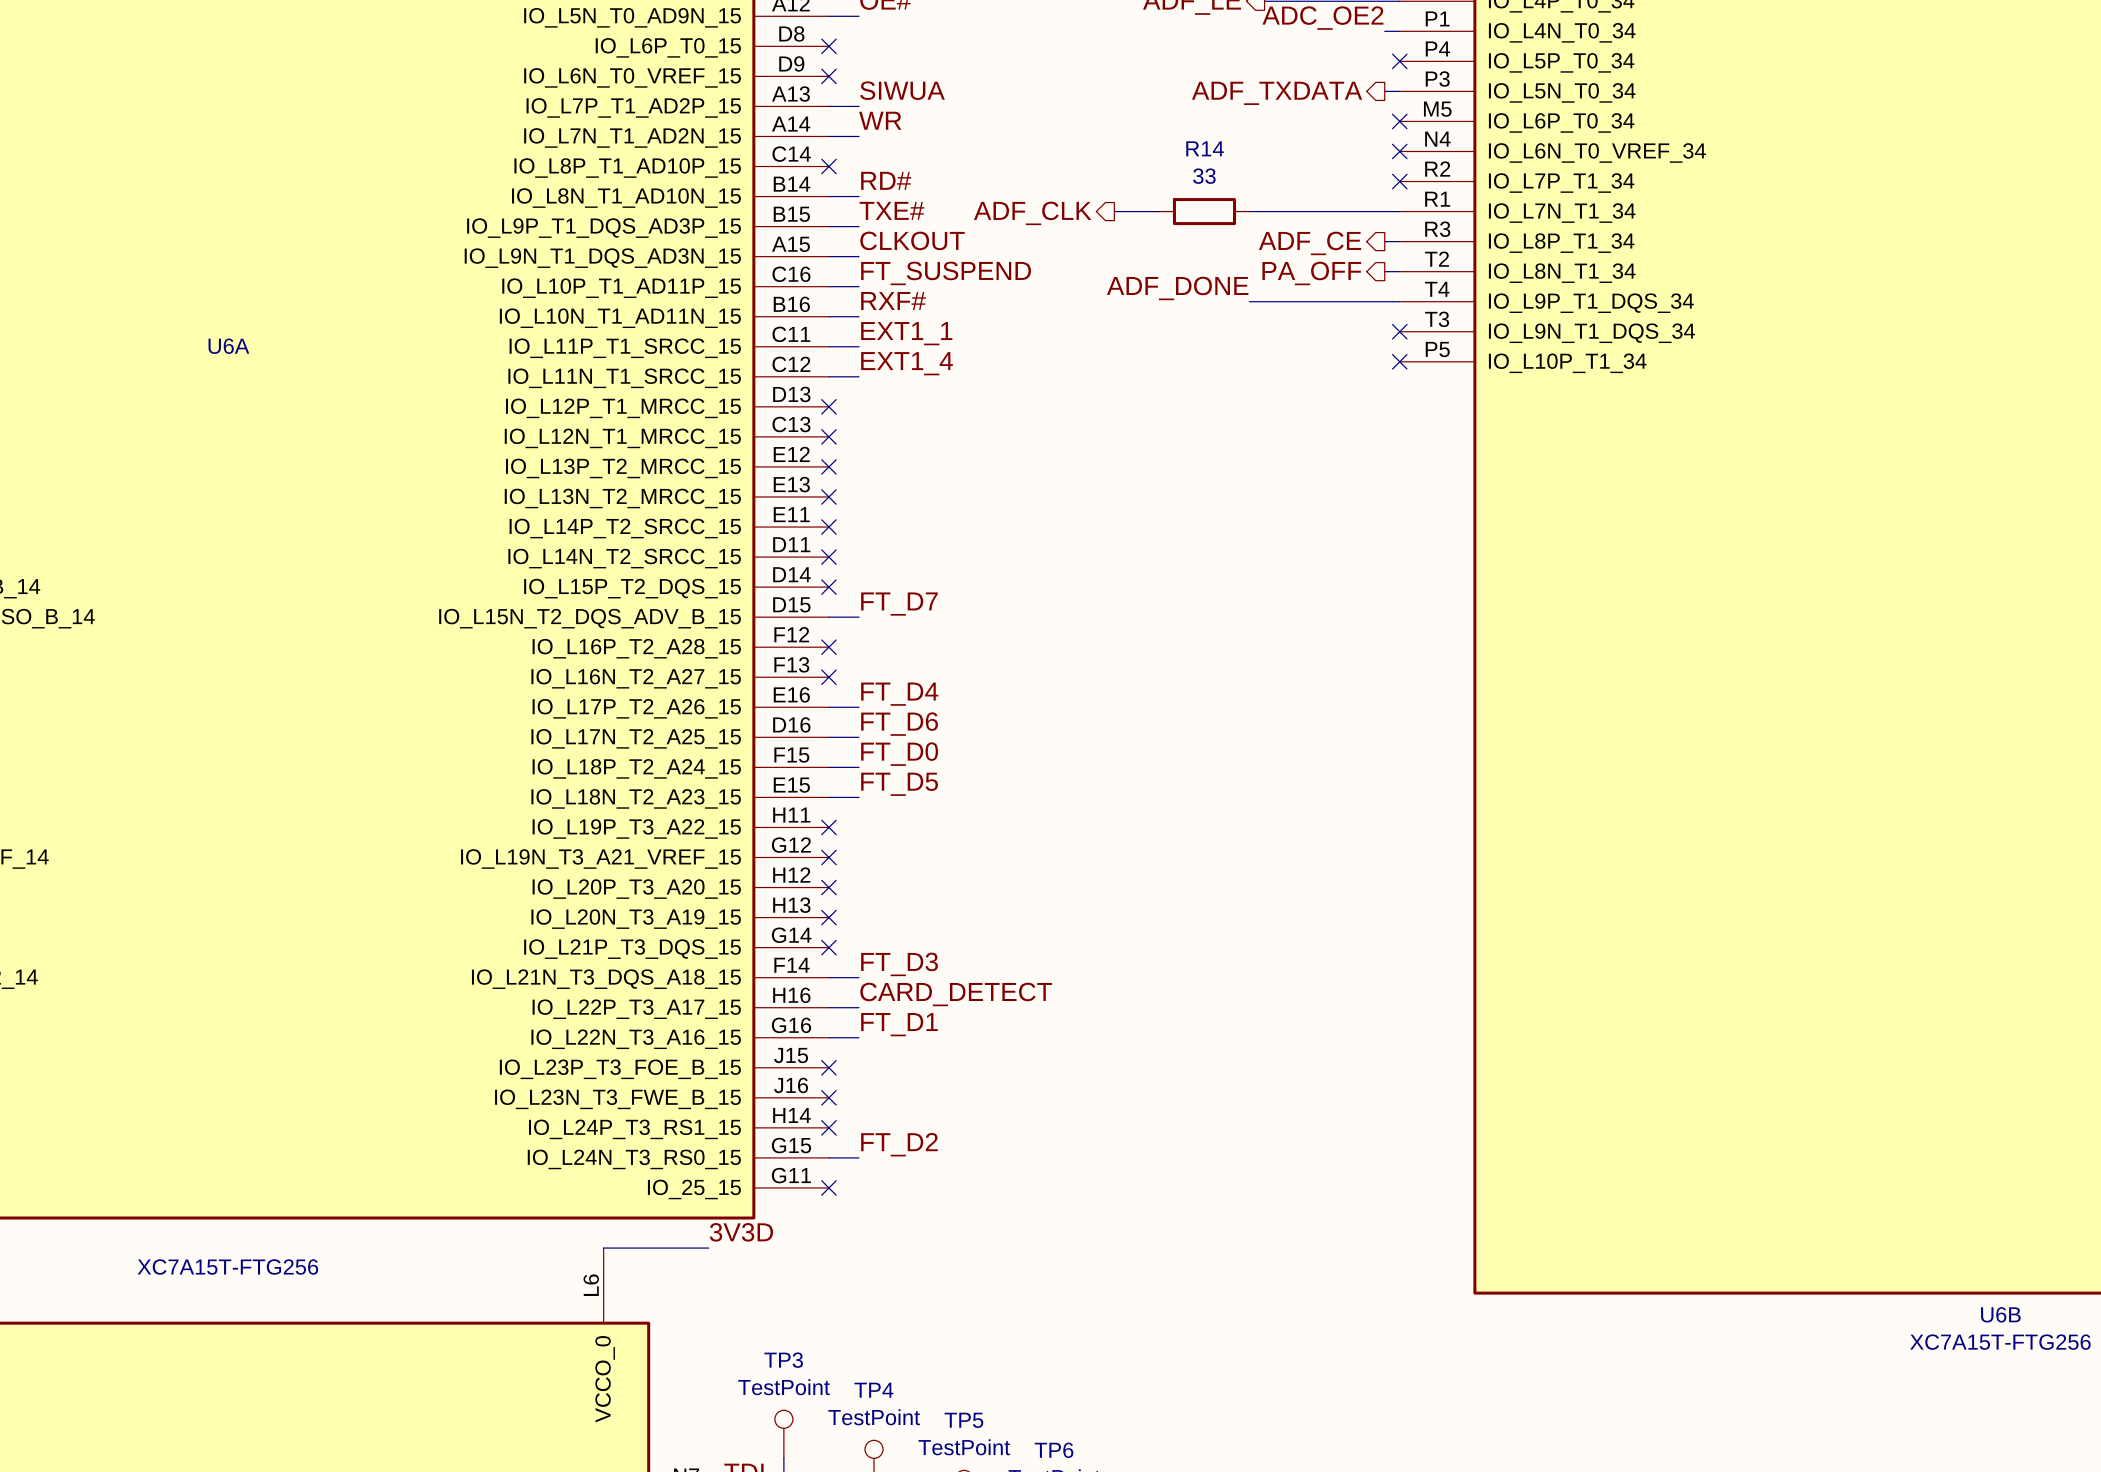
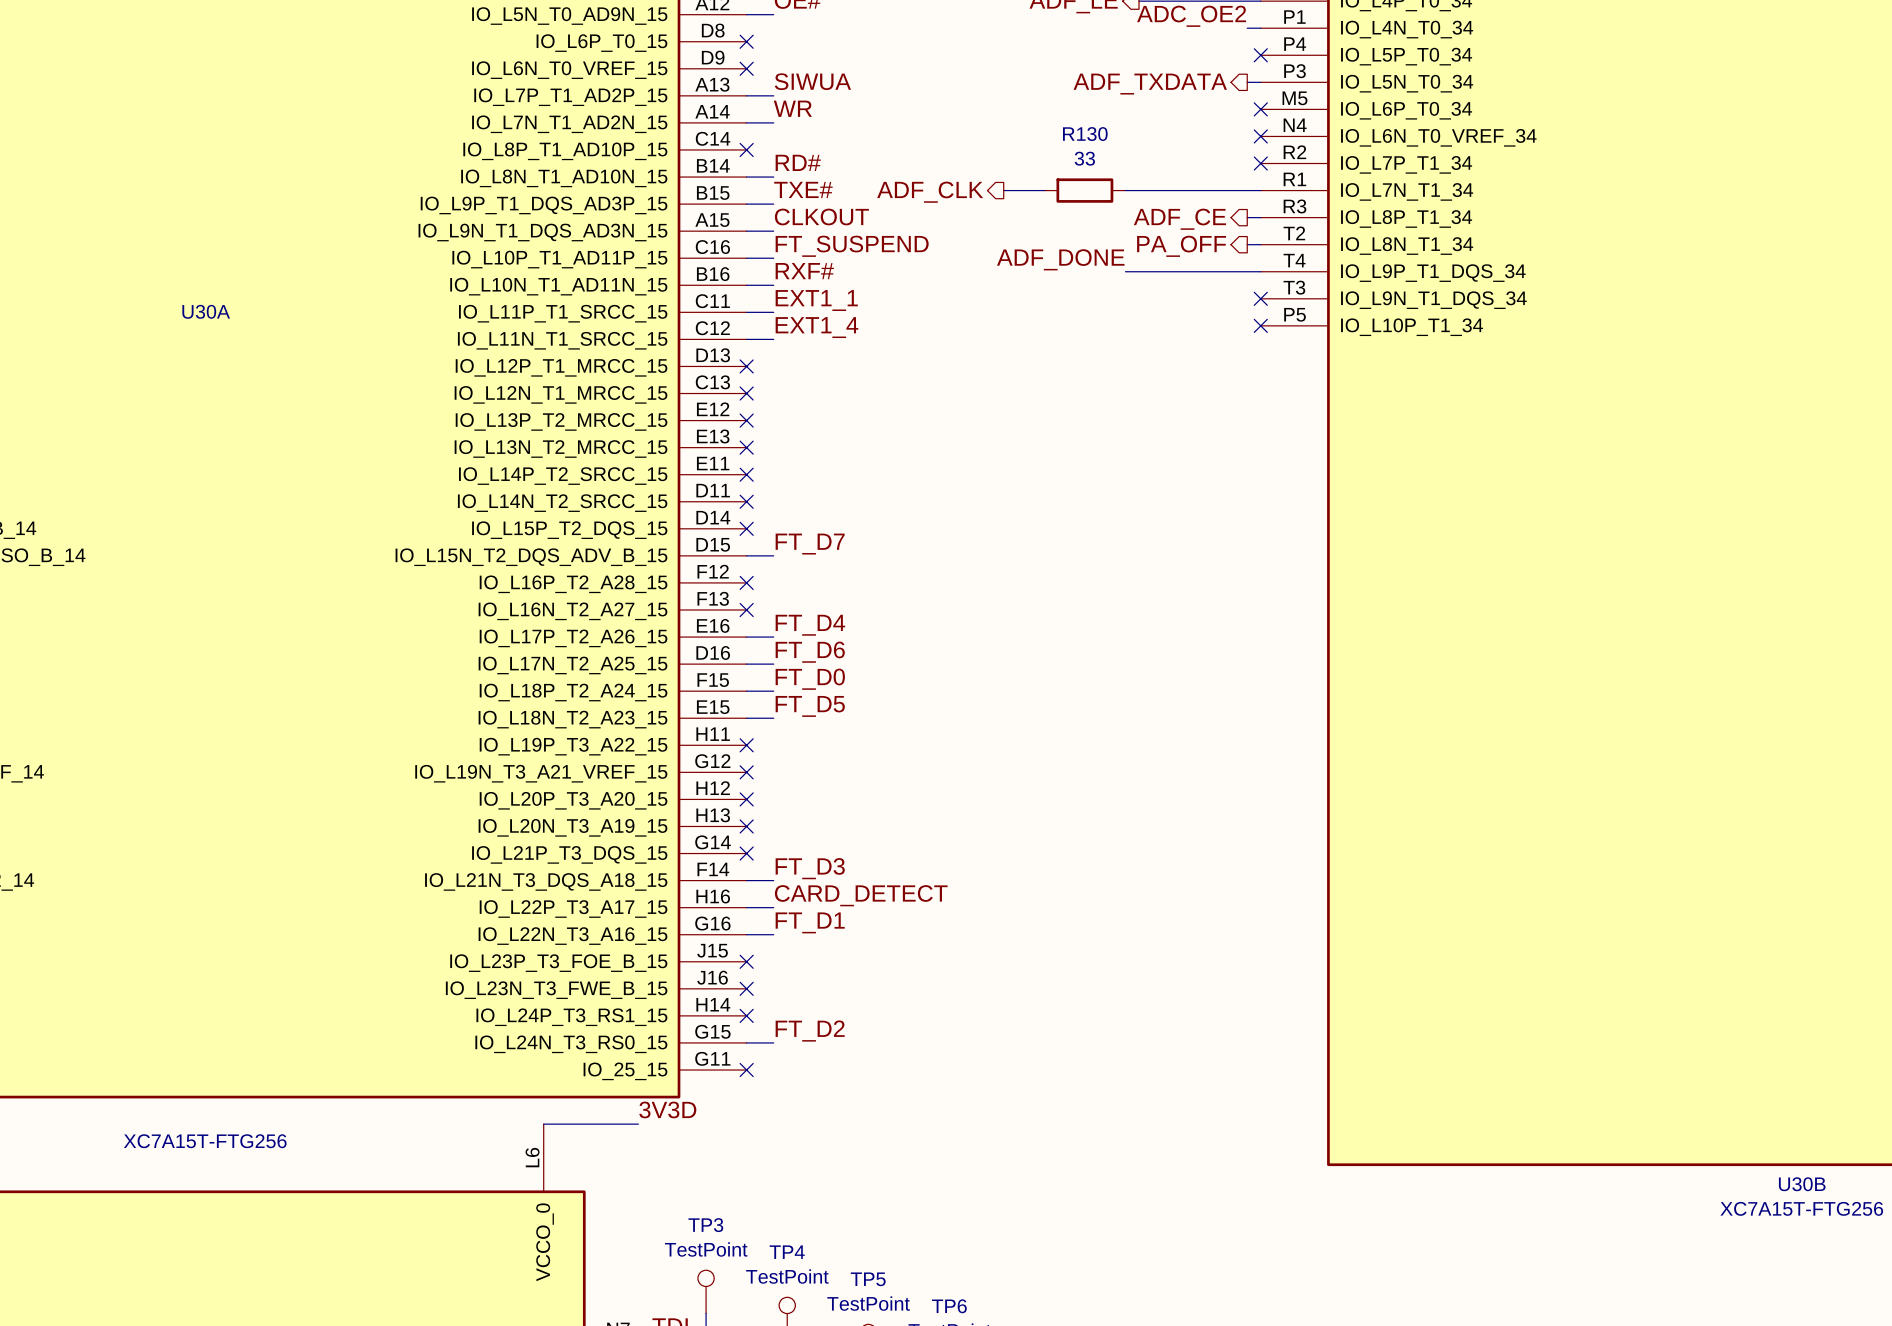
R14 name: R14 (1205, 148) -> R130 (1085, 134)
U6A name: U6A (228, 346) -> U30A (206, 311)
U6B name: U6B (2000, 1314) -> U30B (1802, 1184)

